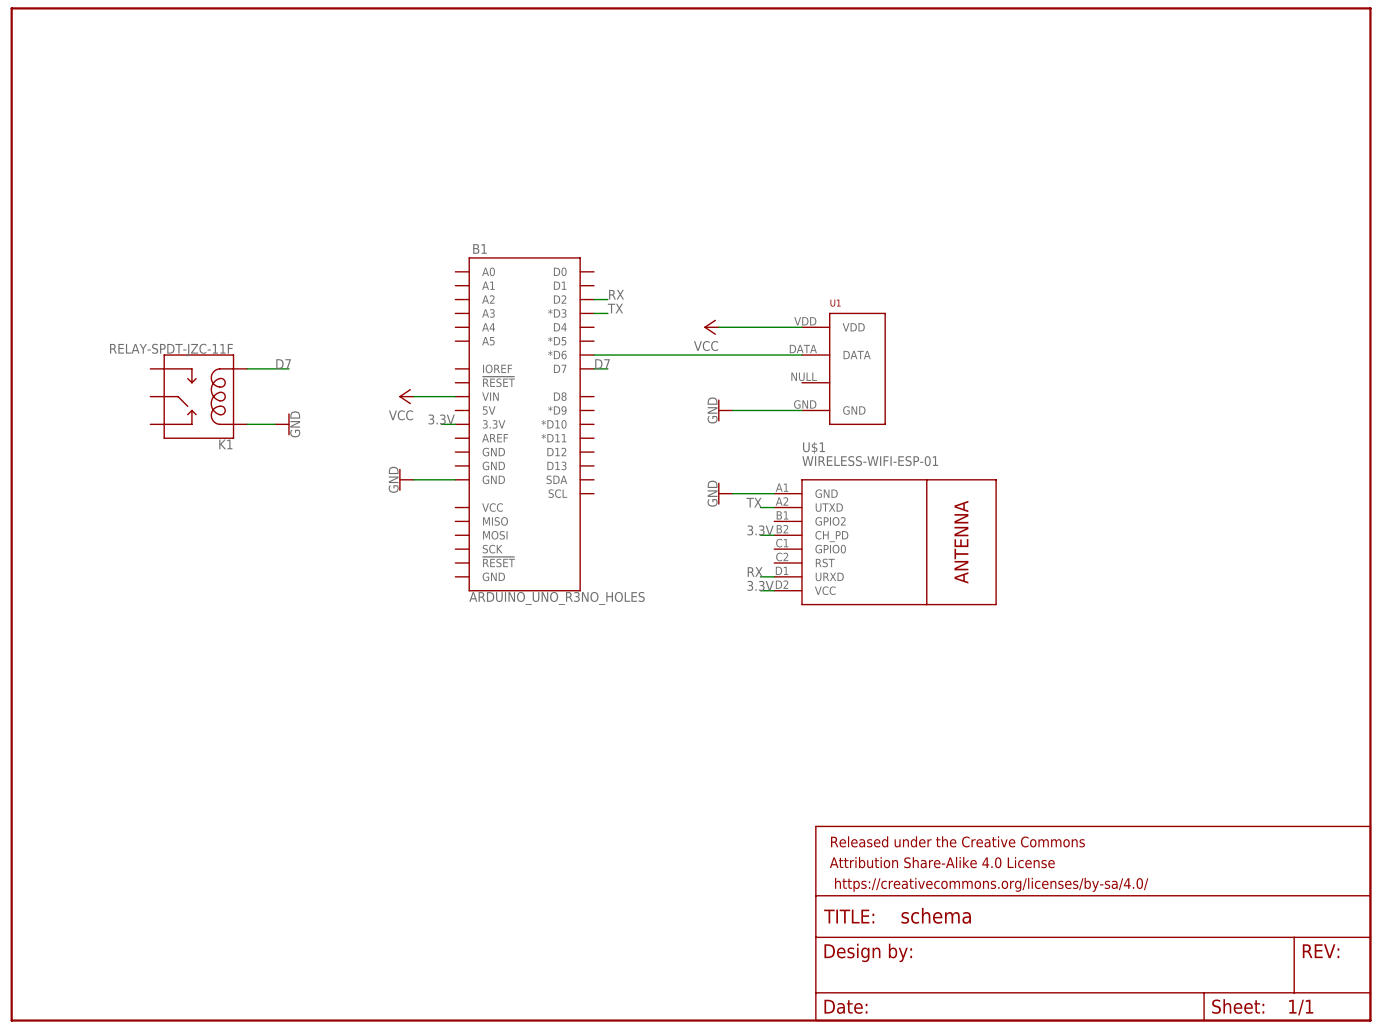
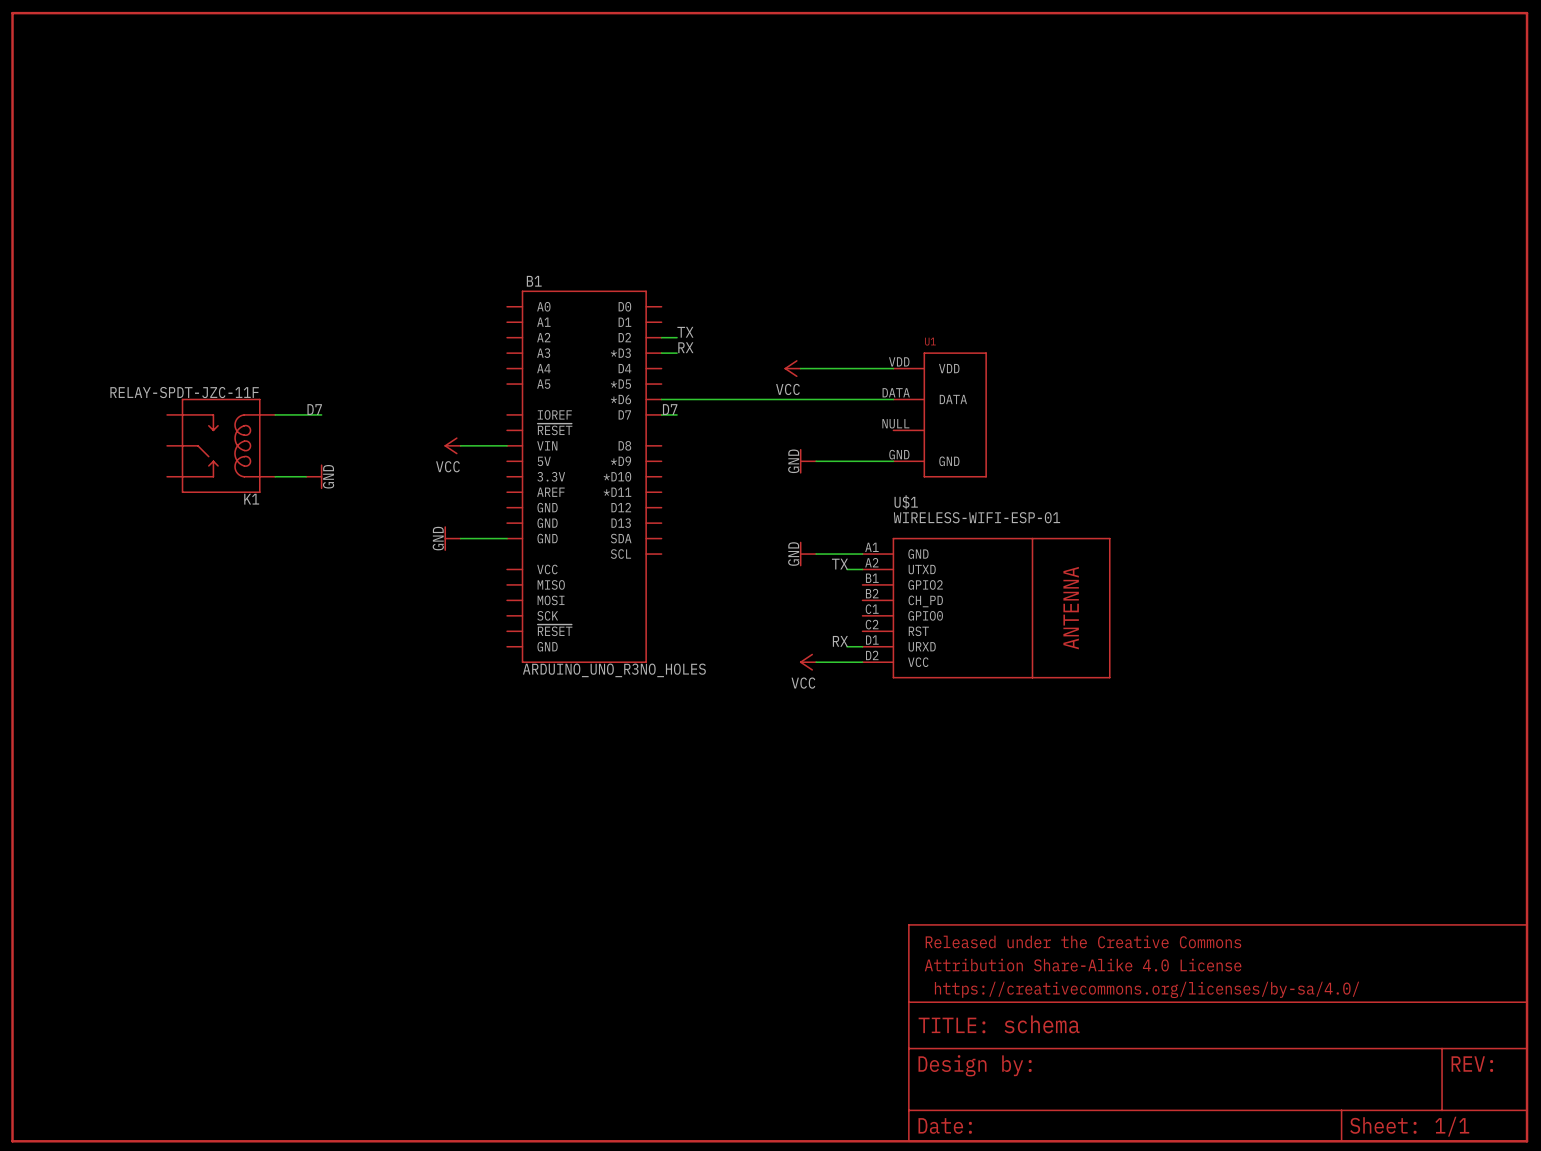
label: RX (616, 294) -> TX (685, 332)
label: TX (615, 308) -> RX (685, 347)
label: 3.3V (441, 419) -> none
wire: (441, 424) (455, 424) -> none
label: 3.3V (760, 530) -> none
wire: (760, 535) (774, 535) -> none
label: 3.3V (760, 585) -> none
power symbol: none -> VCC (808, 662)
wire: none -> (816, 662) (847, 662)

